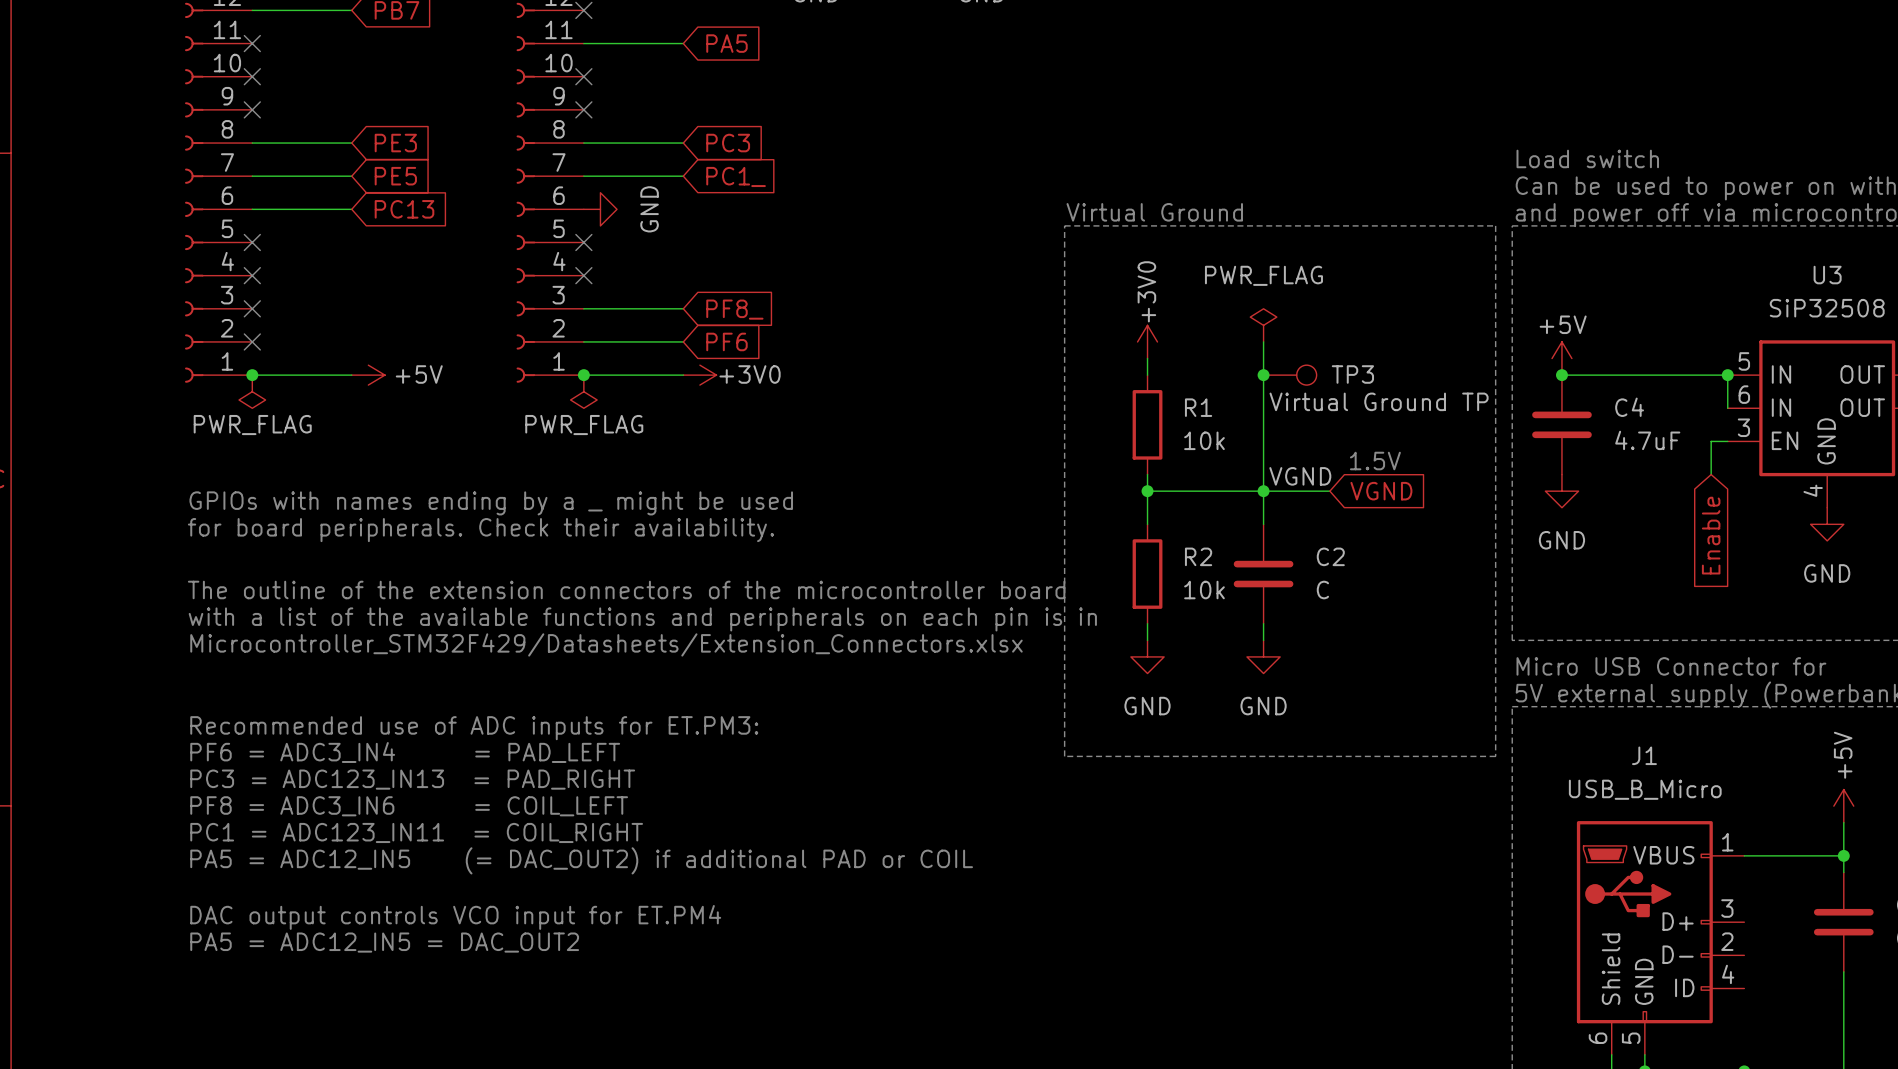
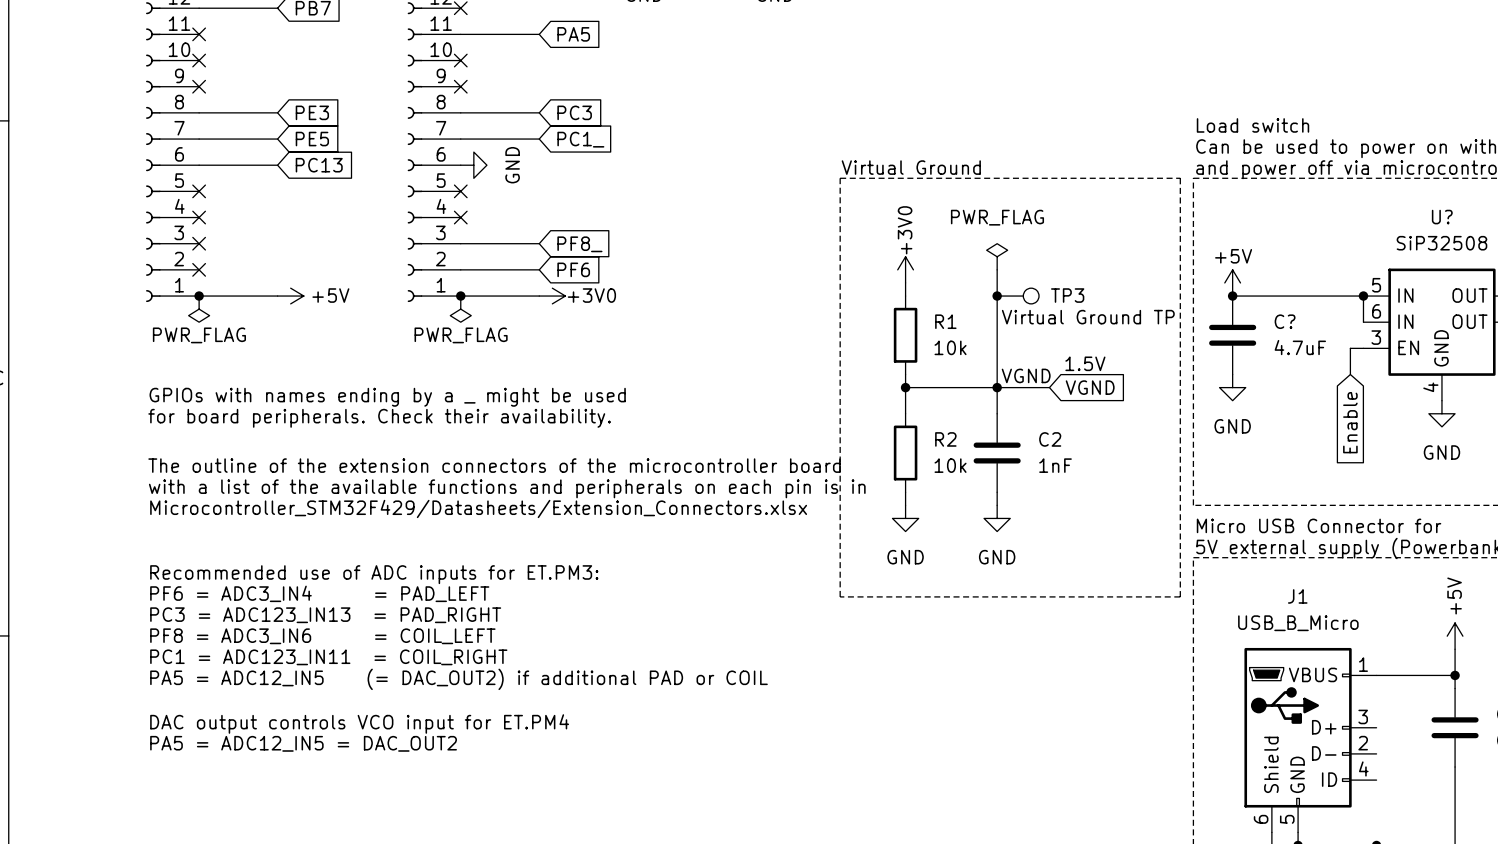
U3 name: U3 (1827, 275) -> U? (1442, 217)
C4 name: C4 (1629, 407) -> C? (1285, 321)
C2 value: C (1322, 590) -> 1nF (1055, 465)

